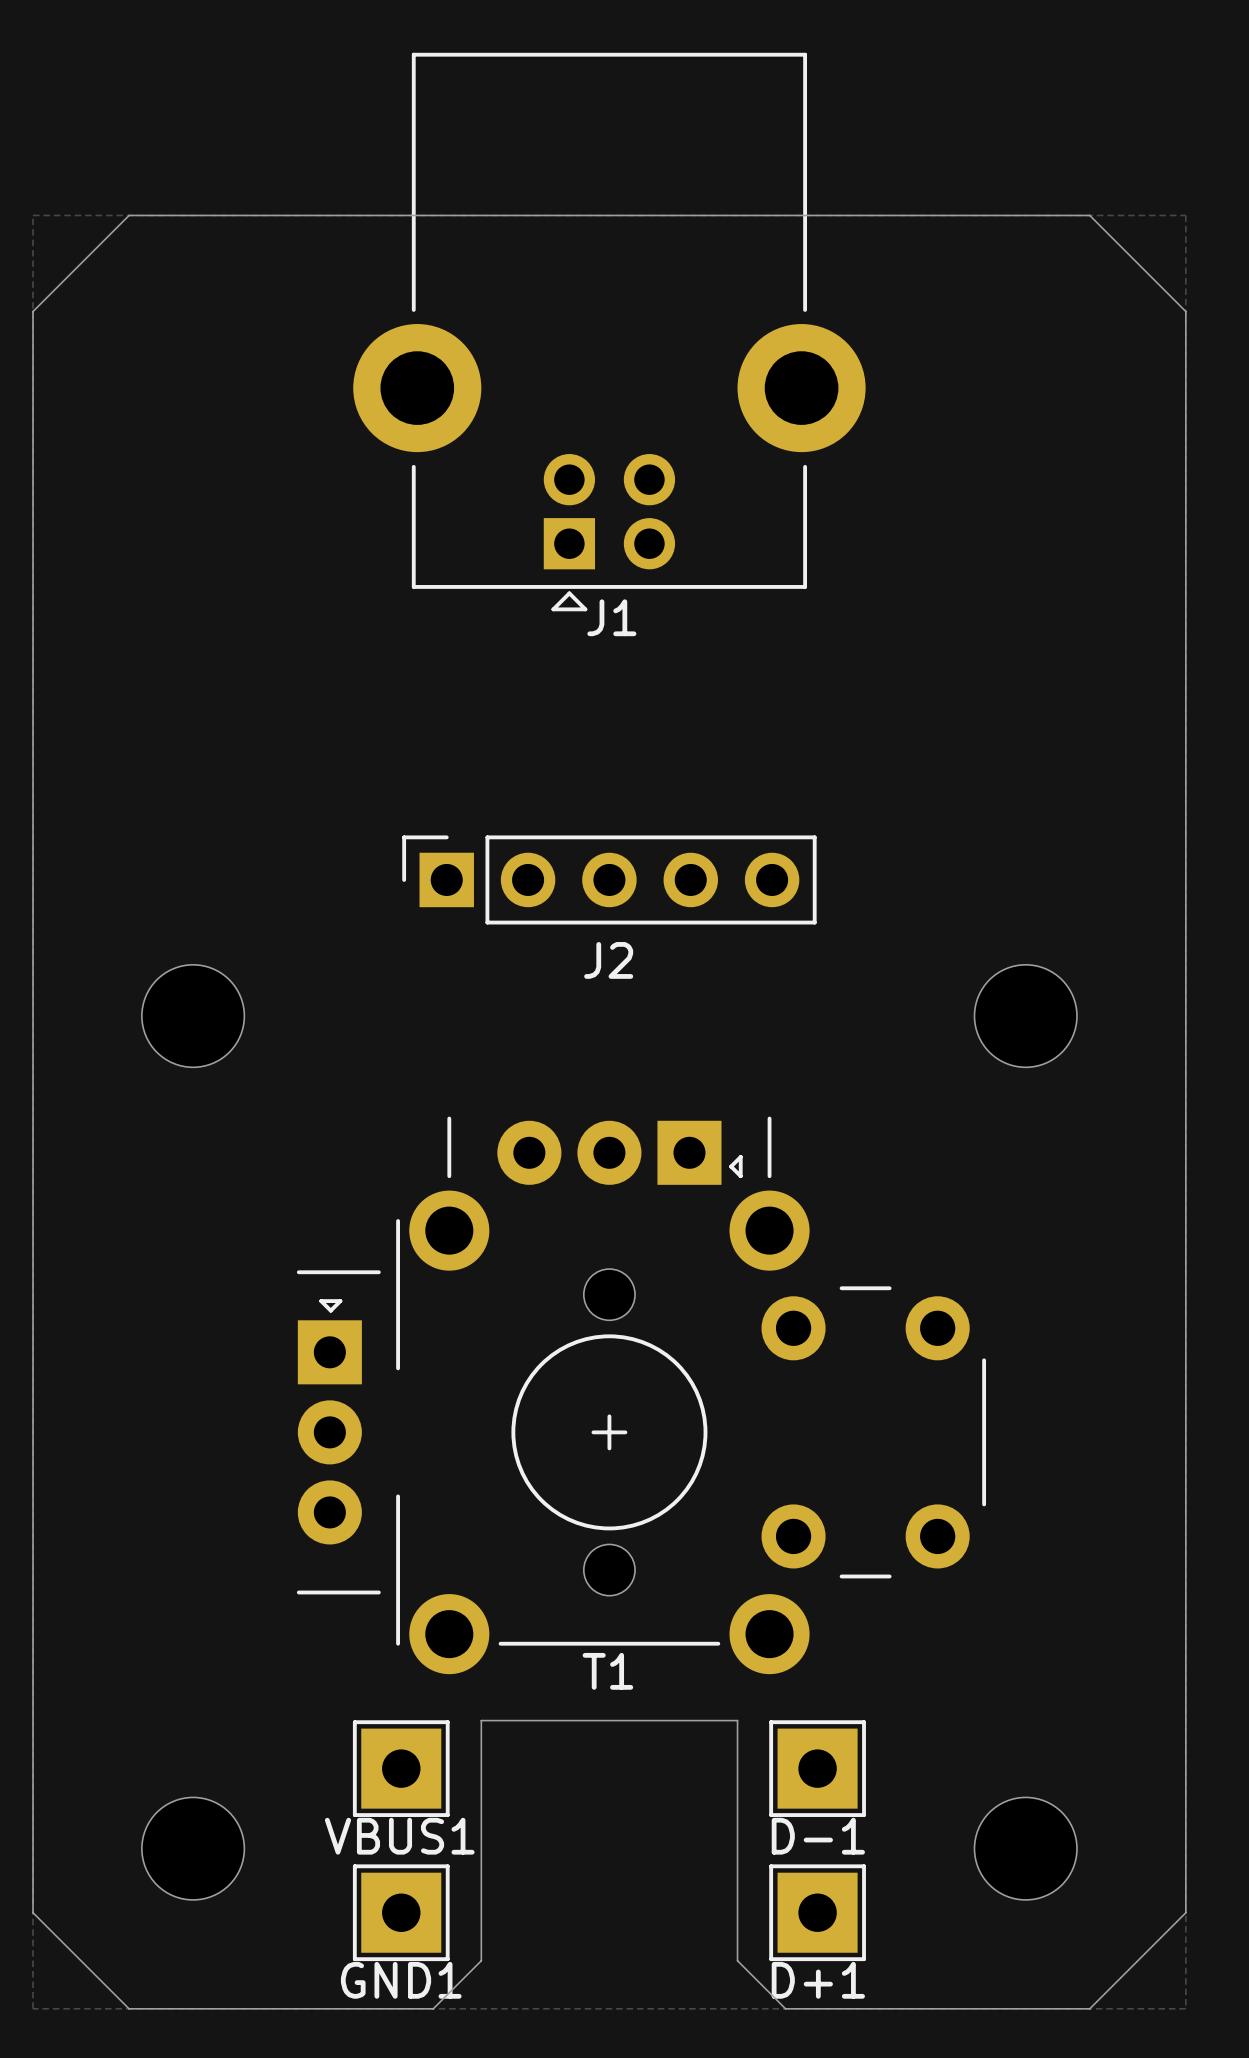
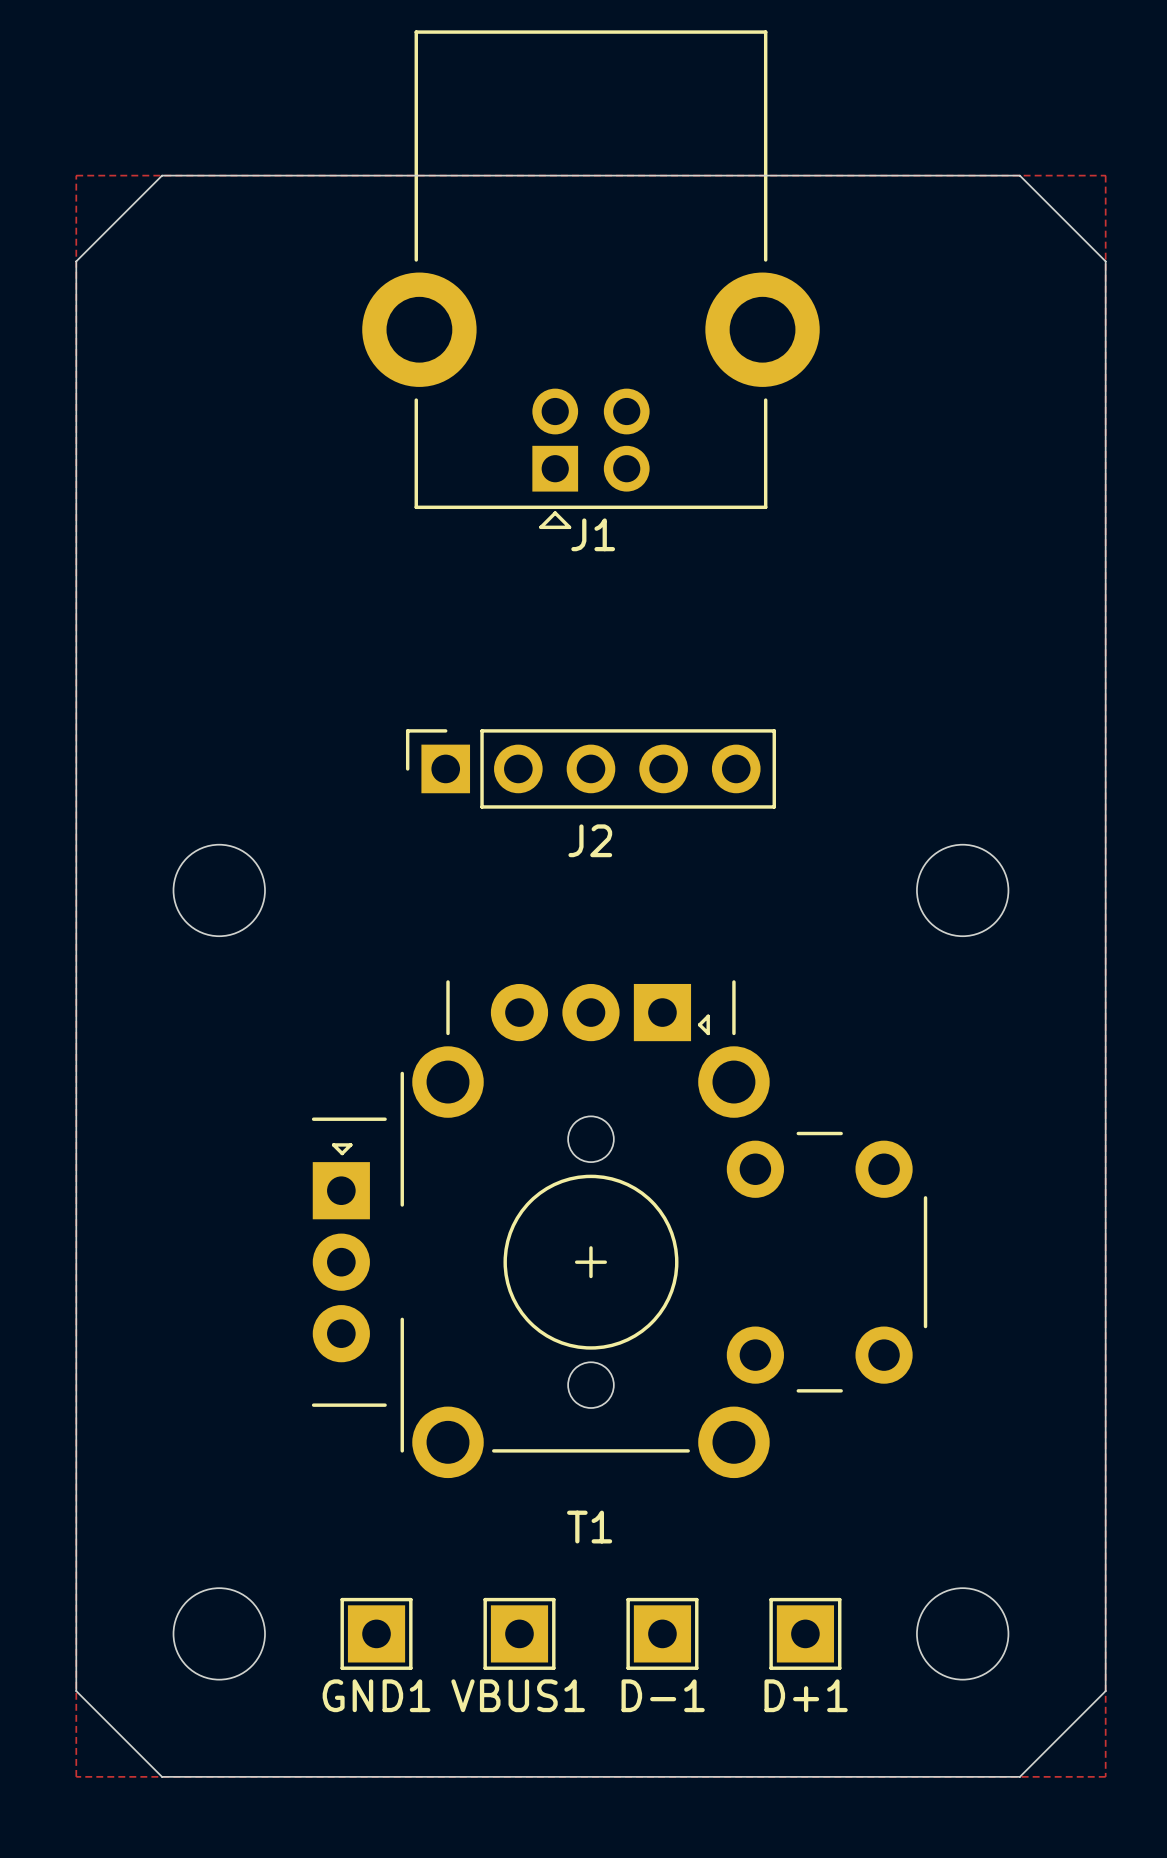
T1 name position: T1 (607, 1671) -> T1 (589, 1527)
VBUS1 footprint: [352, 1720, 450, 1817] -> [483, 1597, 556, 1670]
D-1 footprint: [769, 1720, 866, 1817] -> [626, 1597, 699, 1670]
GND1 footprint: [352, 1864, 450, 1962] -> [340, 1597, 413, 1670]
D+1 footprint: [769, 1864, 866, 1962] -> [769, 1597, 842, 1670]
board edge: (433, 2008) (481, 1960) (481, 1720) (737, 1720) (737, 1960) (785, 2008) -> (433, 1776) (748, 1776)

